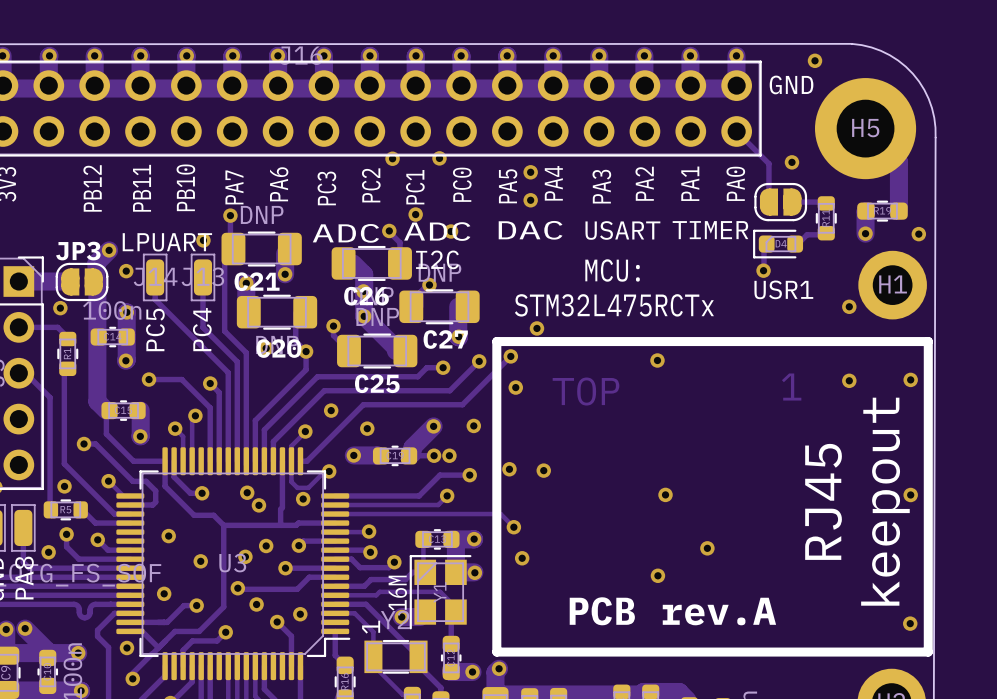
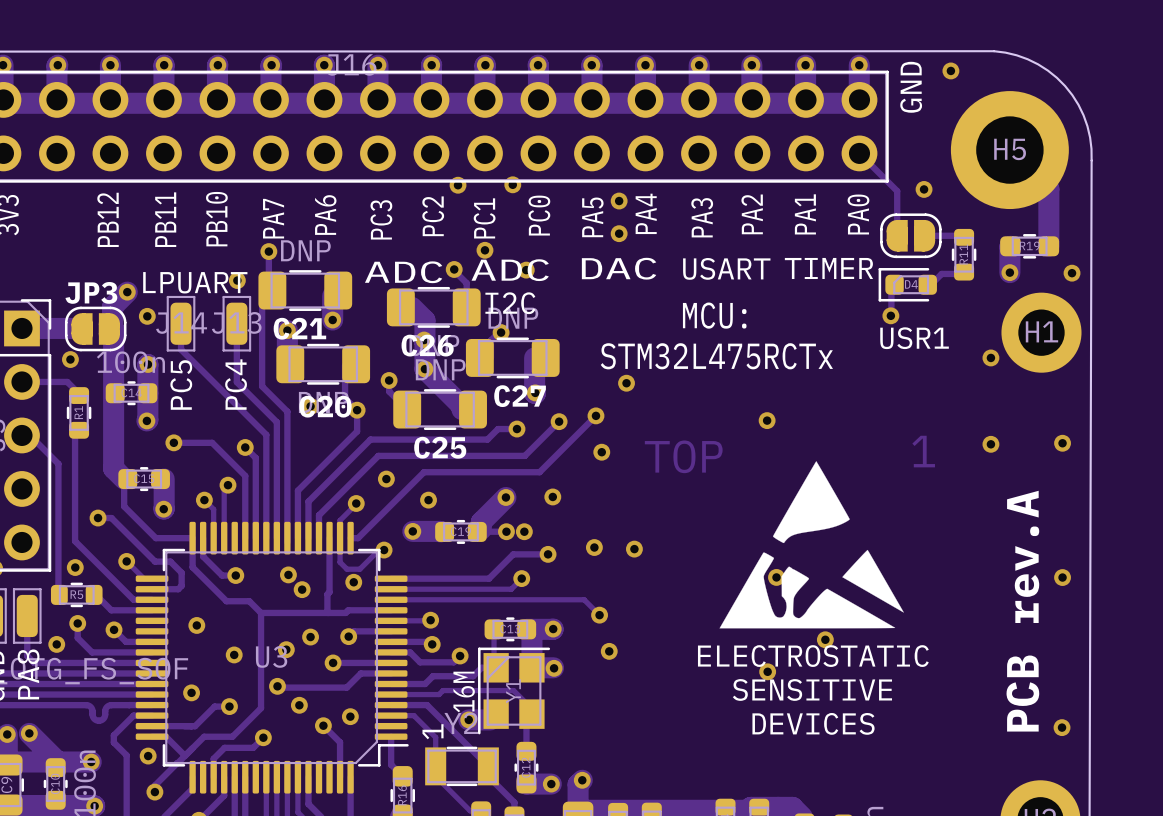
text rotation: 0° (791, 84) -> 90° counterclockwise (911, 87)
line: (496, 341) (928, 341) (928, 652) (496, 652) (496, 341) -> none
drawing: none -> [719, 461, 904, 629]
text: RJ45 (823, 501) -> none
text: keepout (885, 501) -> none
text: none -> ELECTROSTATIC (813, 656)
text: none -> SENSITIVE (812, 689)
text rotation: 0° (672, 611) -> 90° counterclockwise (1022, 611)
text: none -> DEVICES (813, 723)

